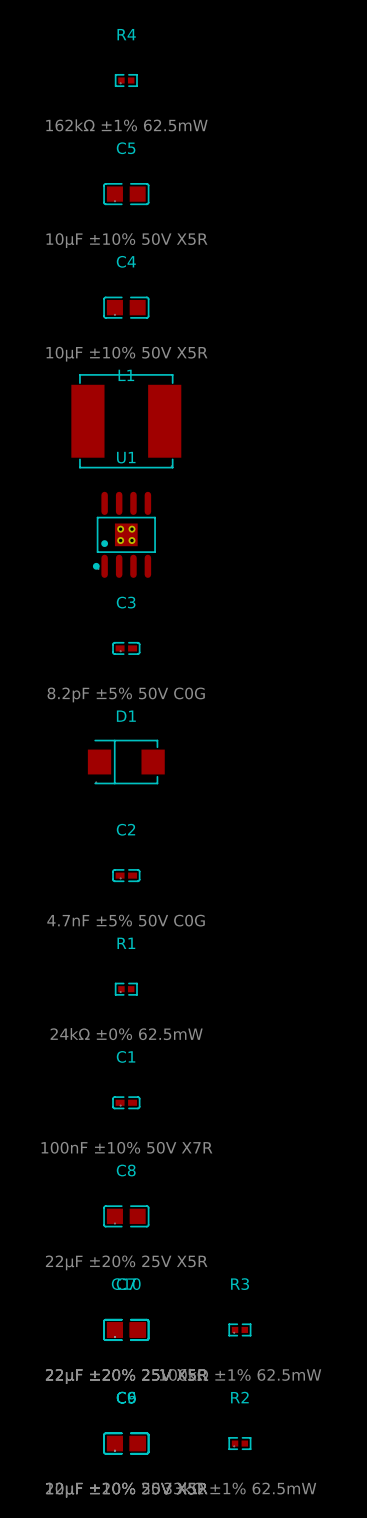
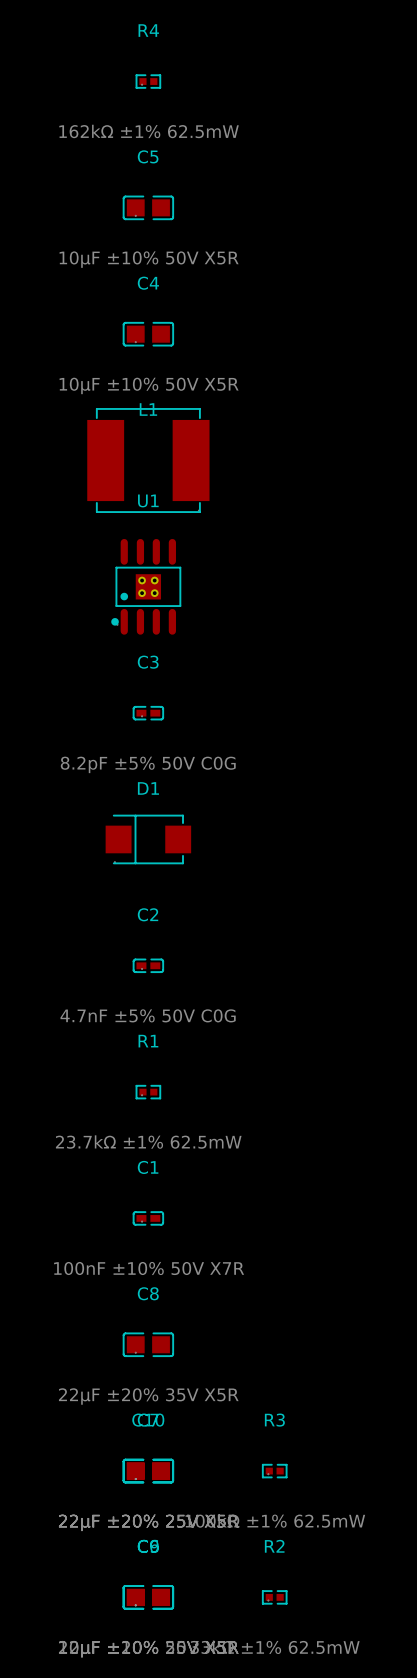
R1 value: 24kΩ ±0% 62.5mW (126, 1034) -> 23.7kΩ ±1% 62.5mW (148, 1142)
C8 value: 22µF ±20% 25V X5R (126, 1262) -> 22µF ±20% 35V X5R (148, 1396)

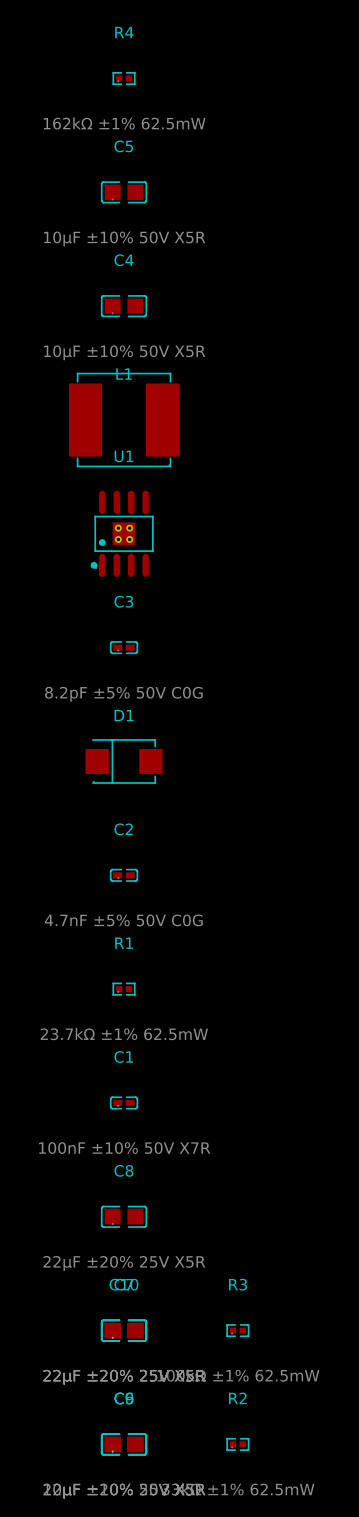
C8 value: 22µF ±20% 35V X5R (148, 1396) -> 22µF ±20% 25V X5R (124, 1263)

